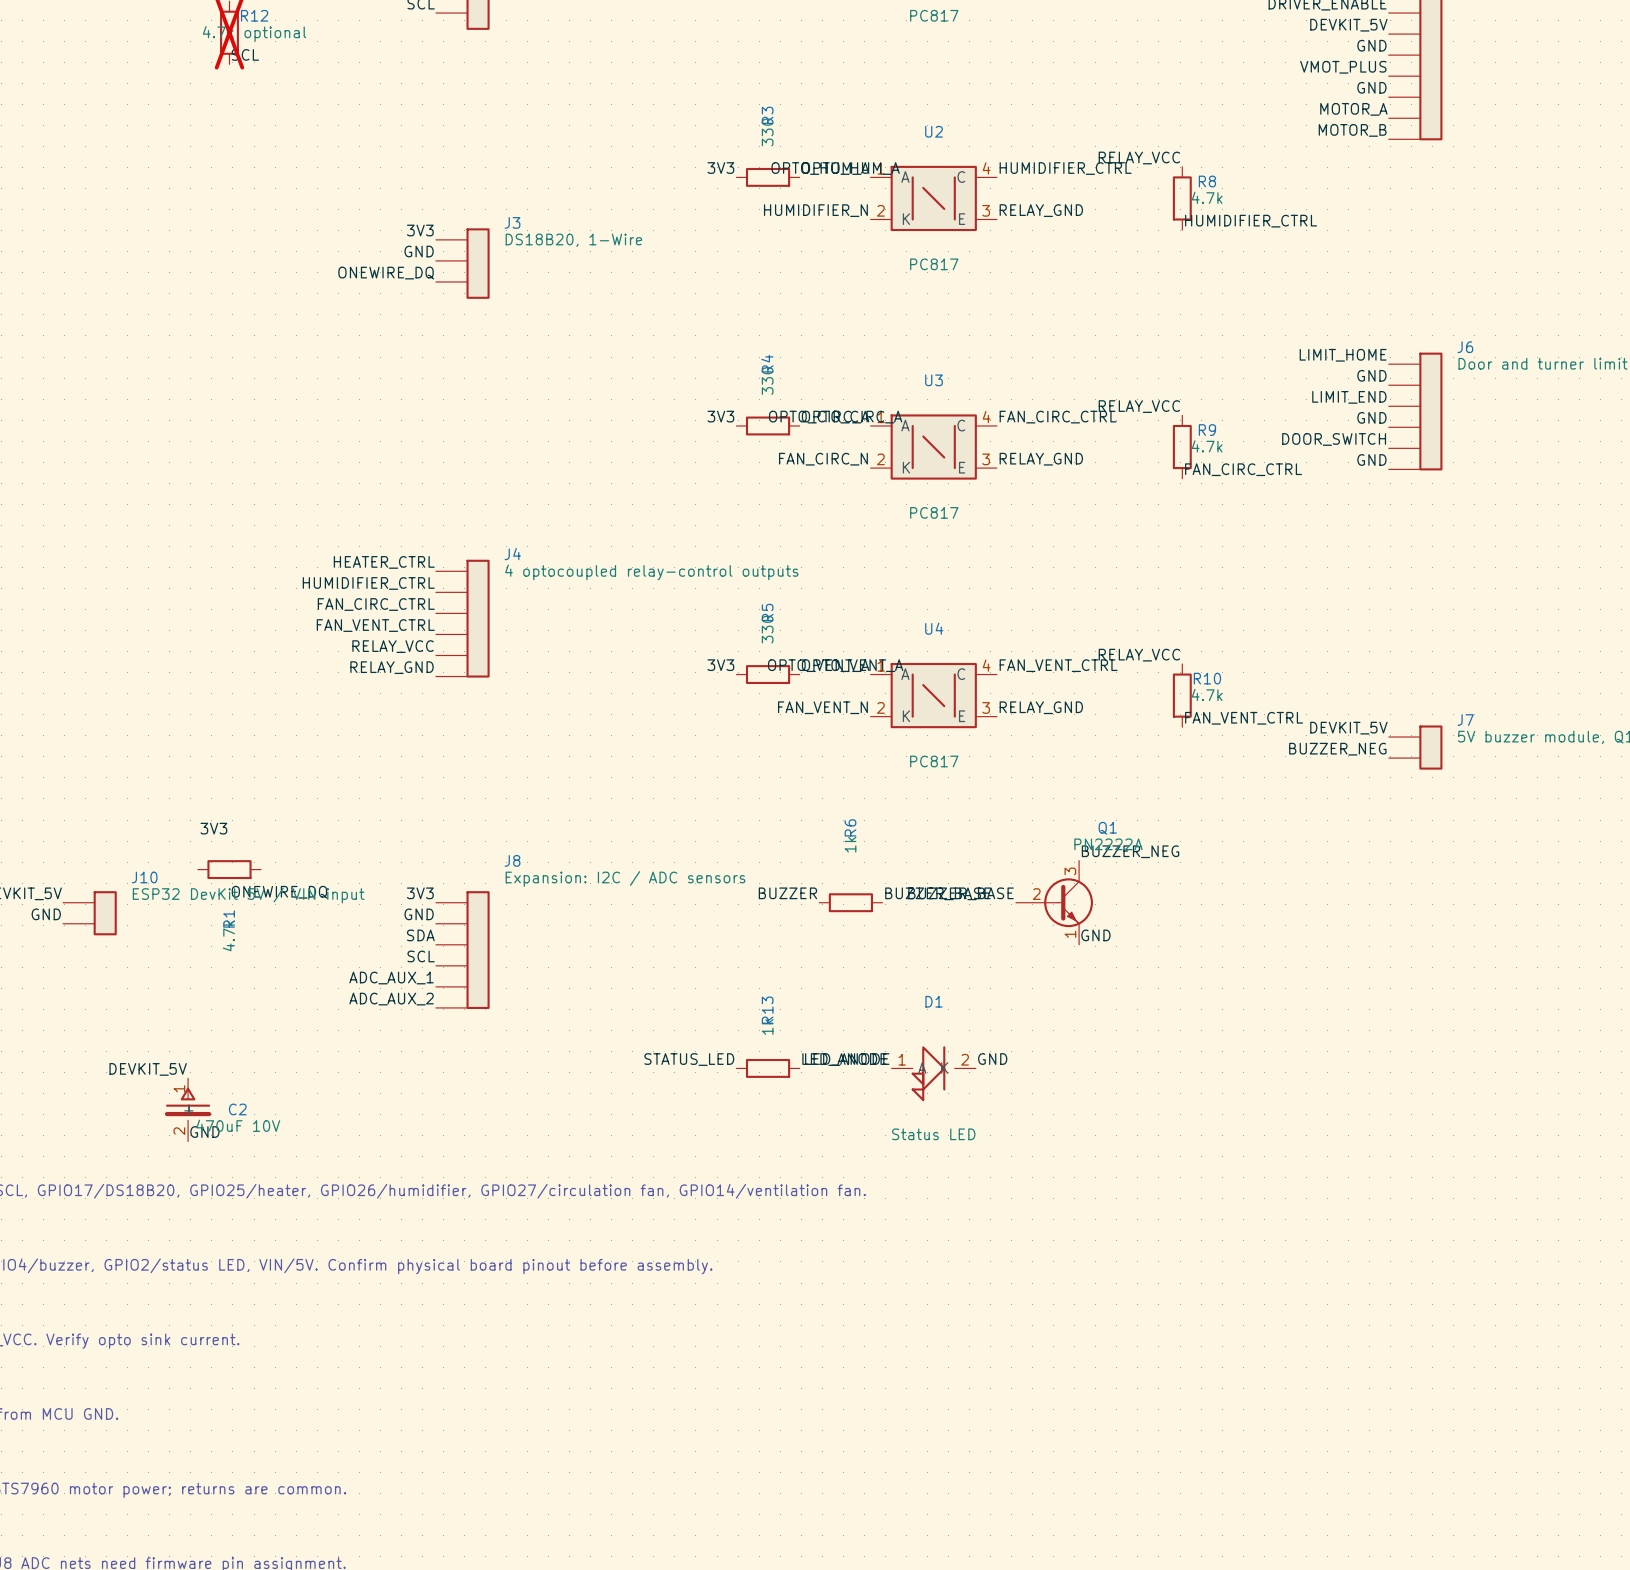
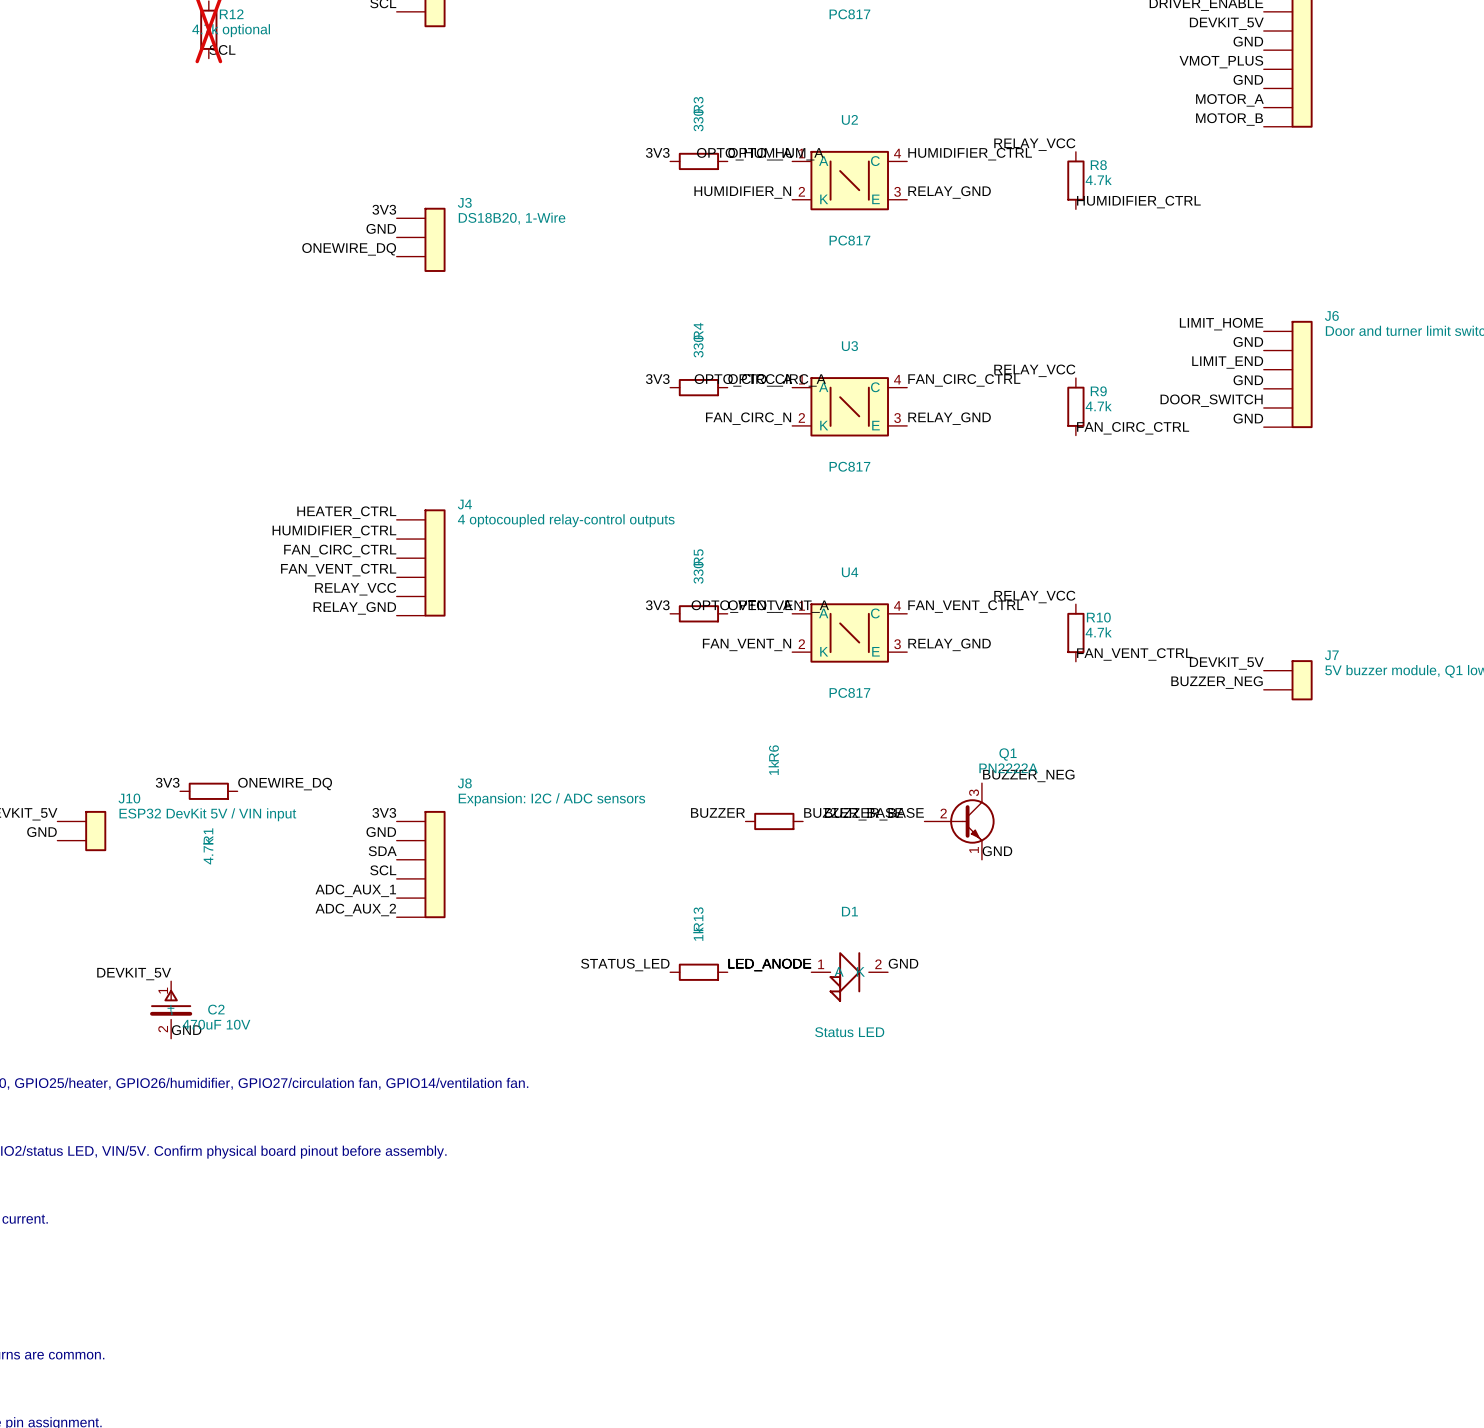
label position: 3V3 (213, 828) -> 3V3 (167, 782)
label position: ONEWIRE_DQ (279, 892) -> ONEWIRE_DQ (285, 784)

